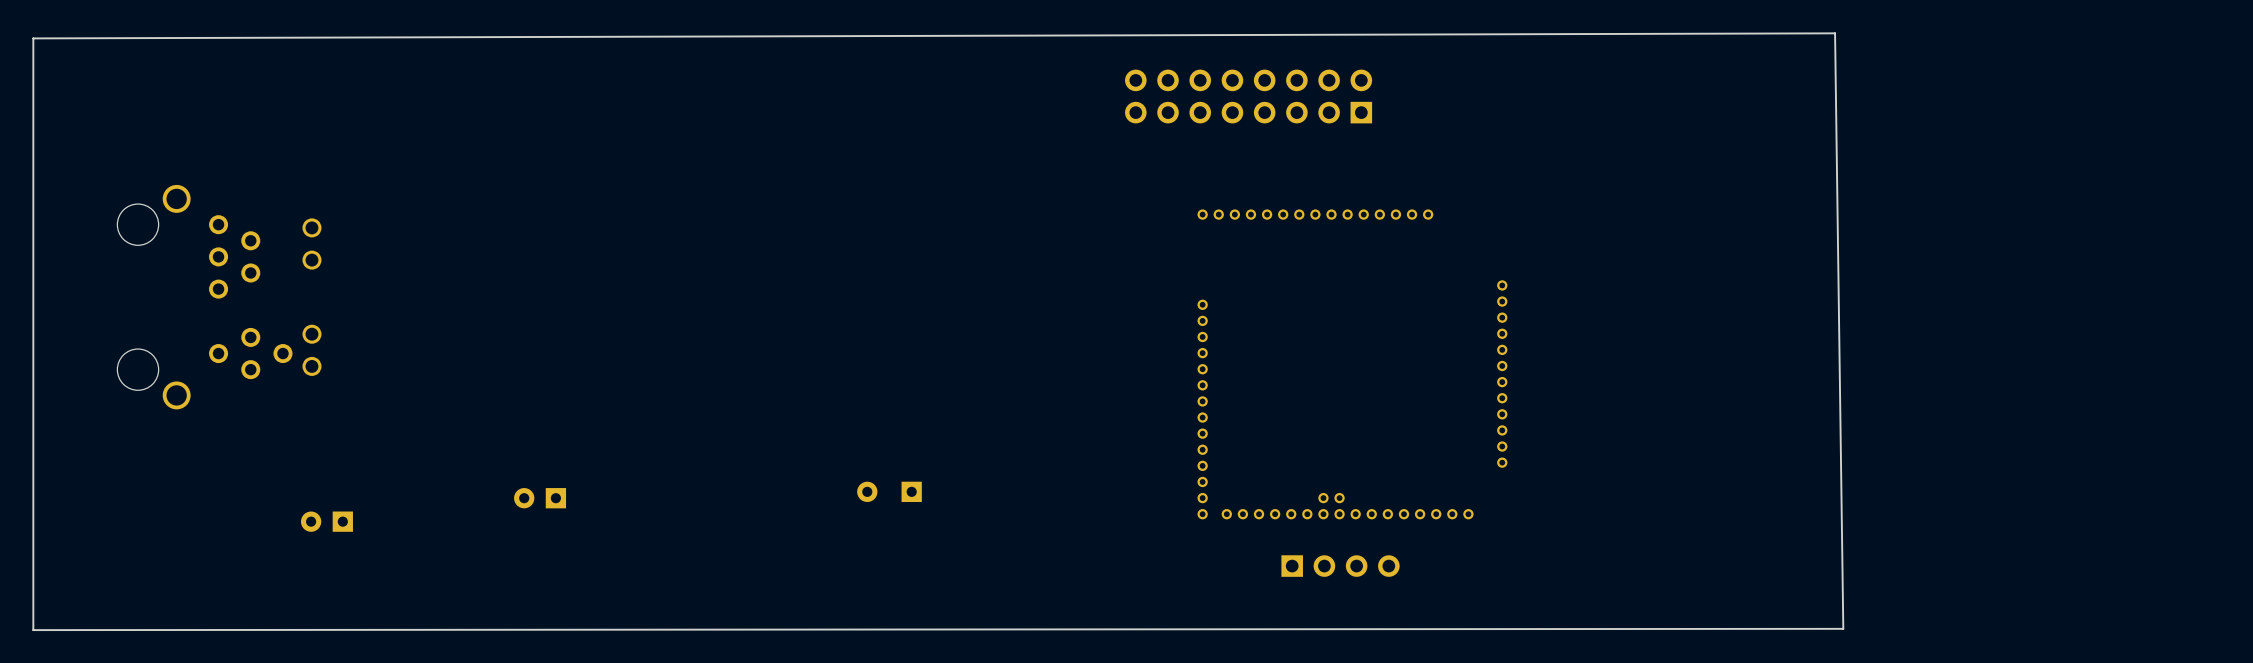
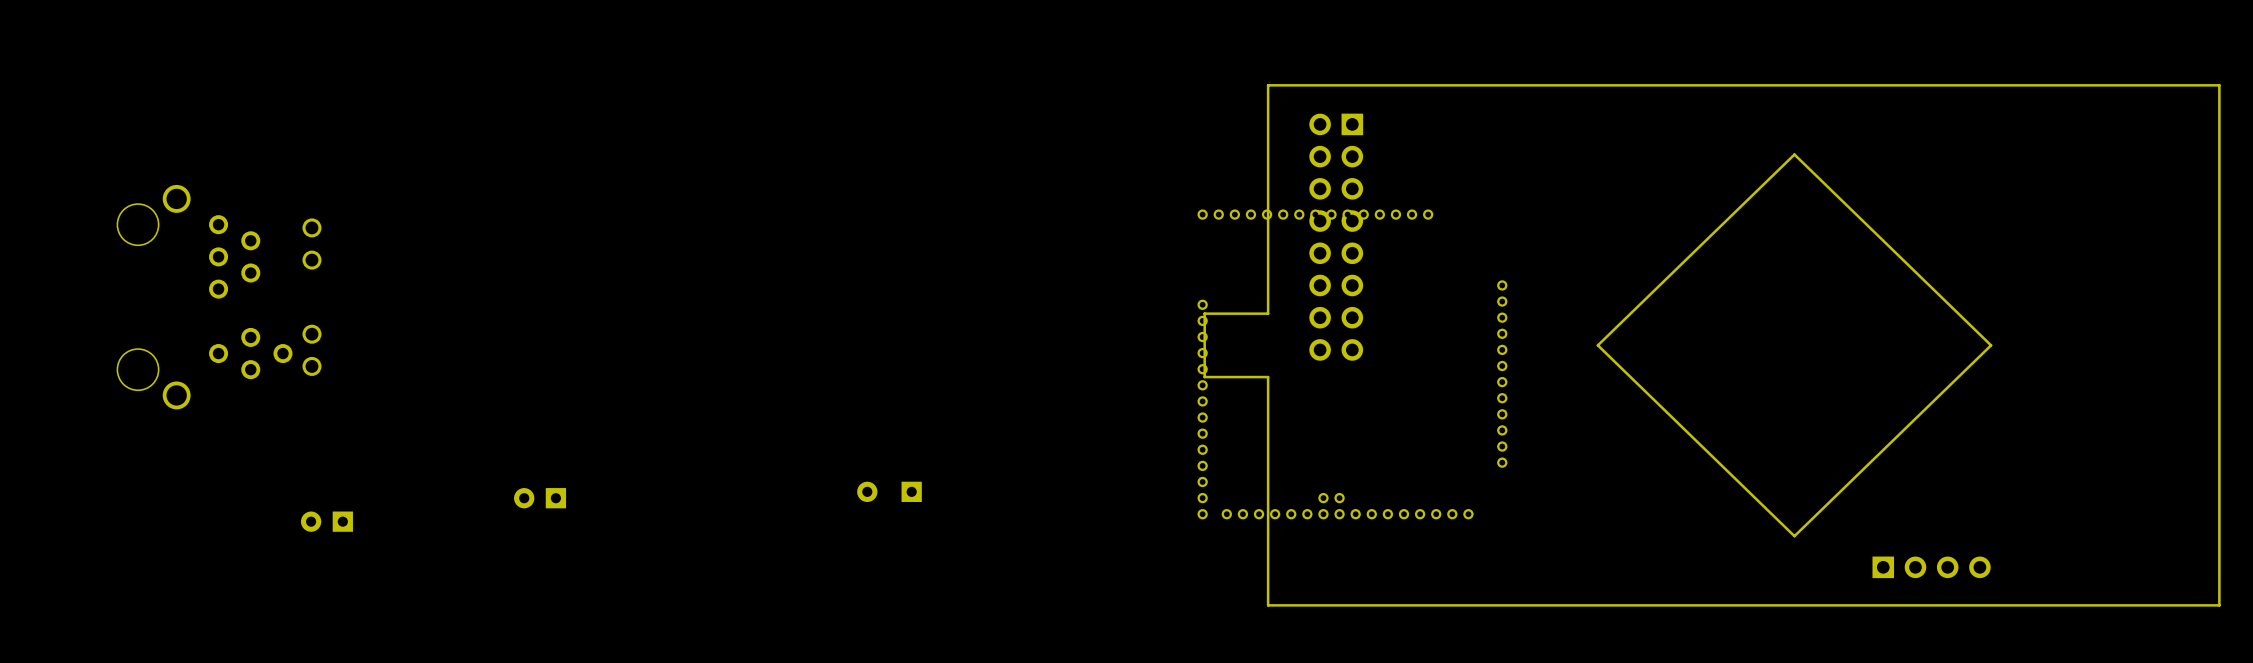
board edge: (1835, 33) (33, 38) (33, 630) (1843, 628) (1835, 33) -> none
board edge: none -> (2219, 85) (2219, 605) (1268, 605) (1268, 377) (1204, 377) (1204, 313) (1268, 313) (1268, 85) (2219, 85)
part rotation: 0° (1248, 96) -> 90° counterclockwise (1336, 237)
part position: (1248, 96) -> (1336, 237)
board edge: none -> (1794, 154) (1991, 345) (1794, 536) (1597, 345) (1794, 154)
part: (1340, 566) -> none
part: none -> (1931, 567)

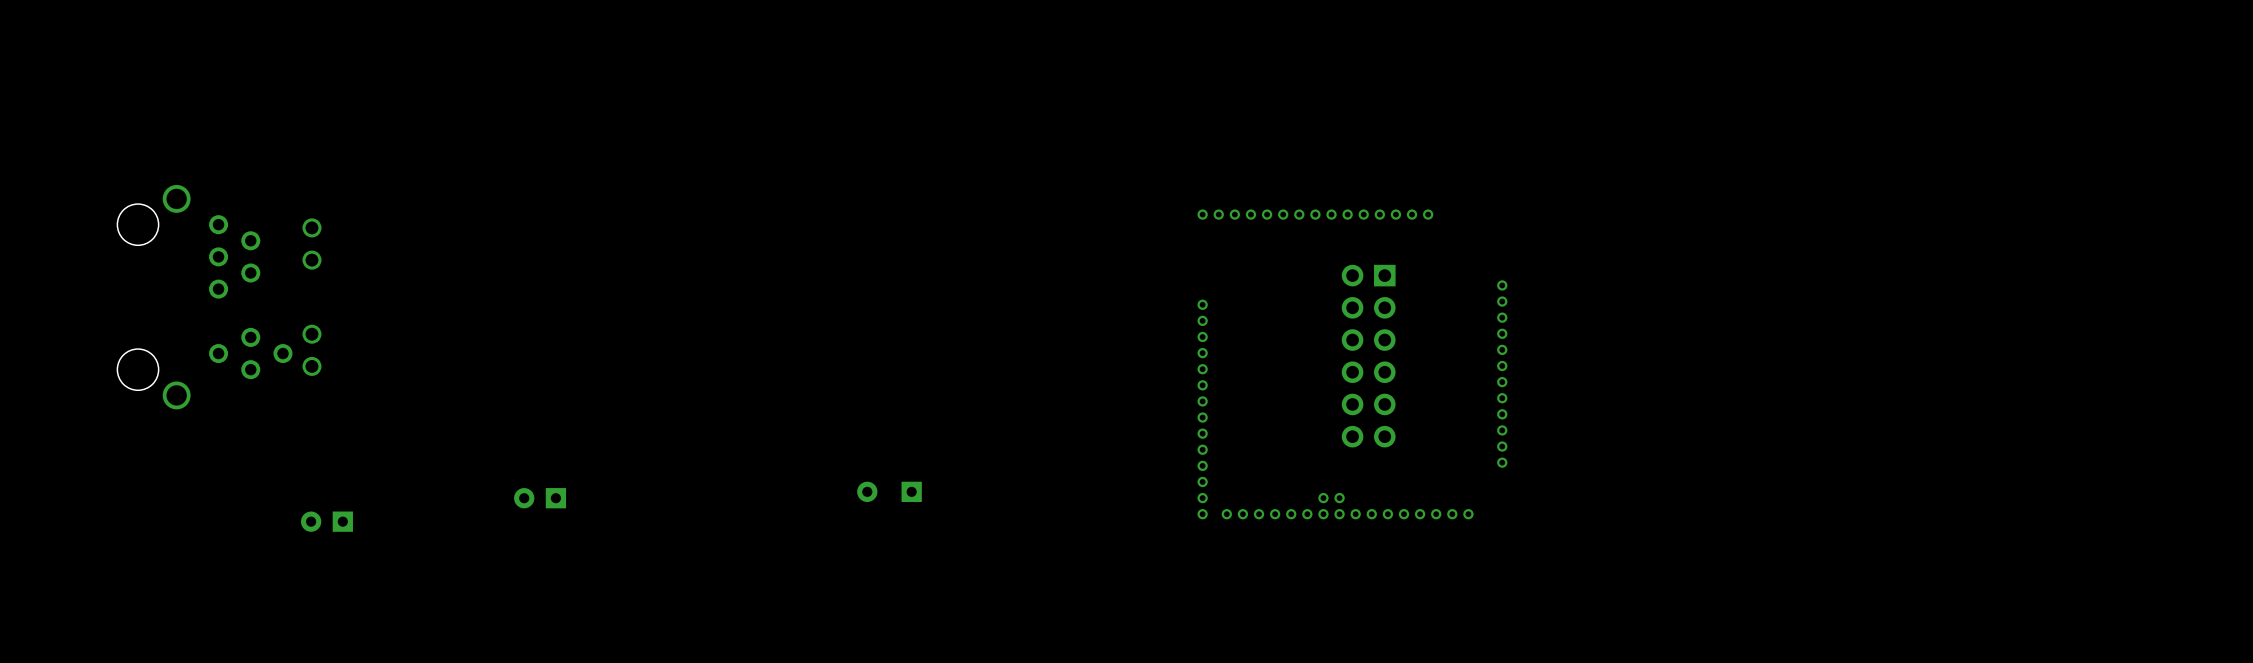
board edge: (2219, 85) (2219, 605) (1268, 605) (1268, 377) (1204, 377) (1204, 313) (1268, 313) (1268, 85) (2219, 85) -> none
board edge: (1794, 154) (1991, 345) (1794, 536) (1597, 345) (1794, 154) -> none
part: (1336, 237) -> none
part: none -> (1368, 356)
part: (1931, 567) -> none

